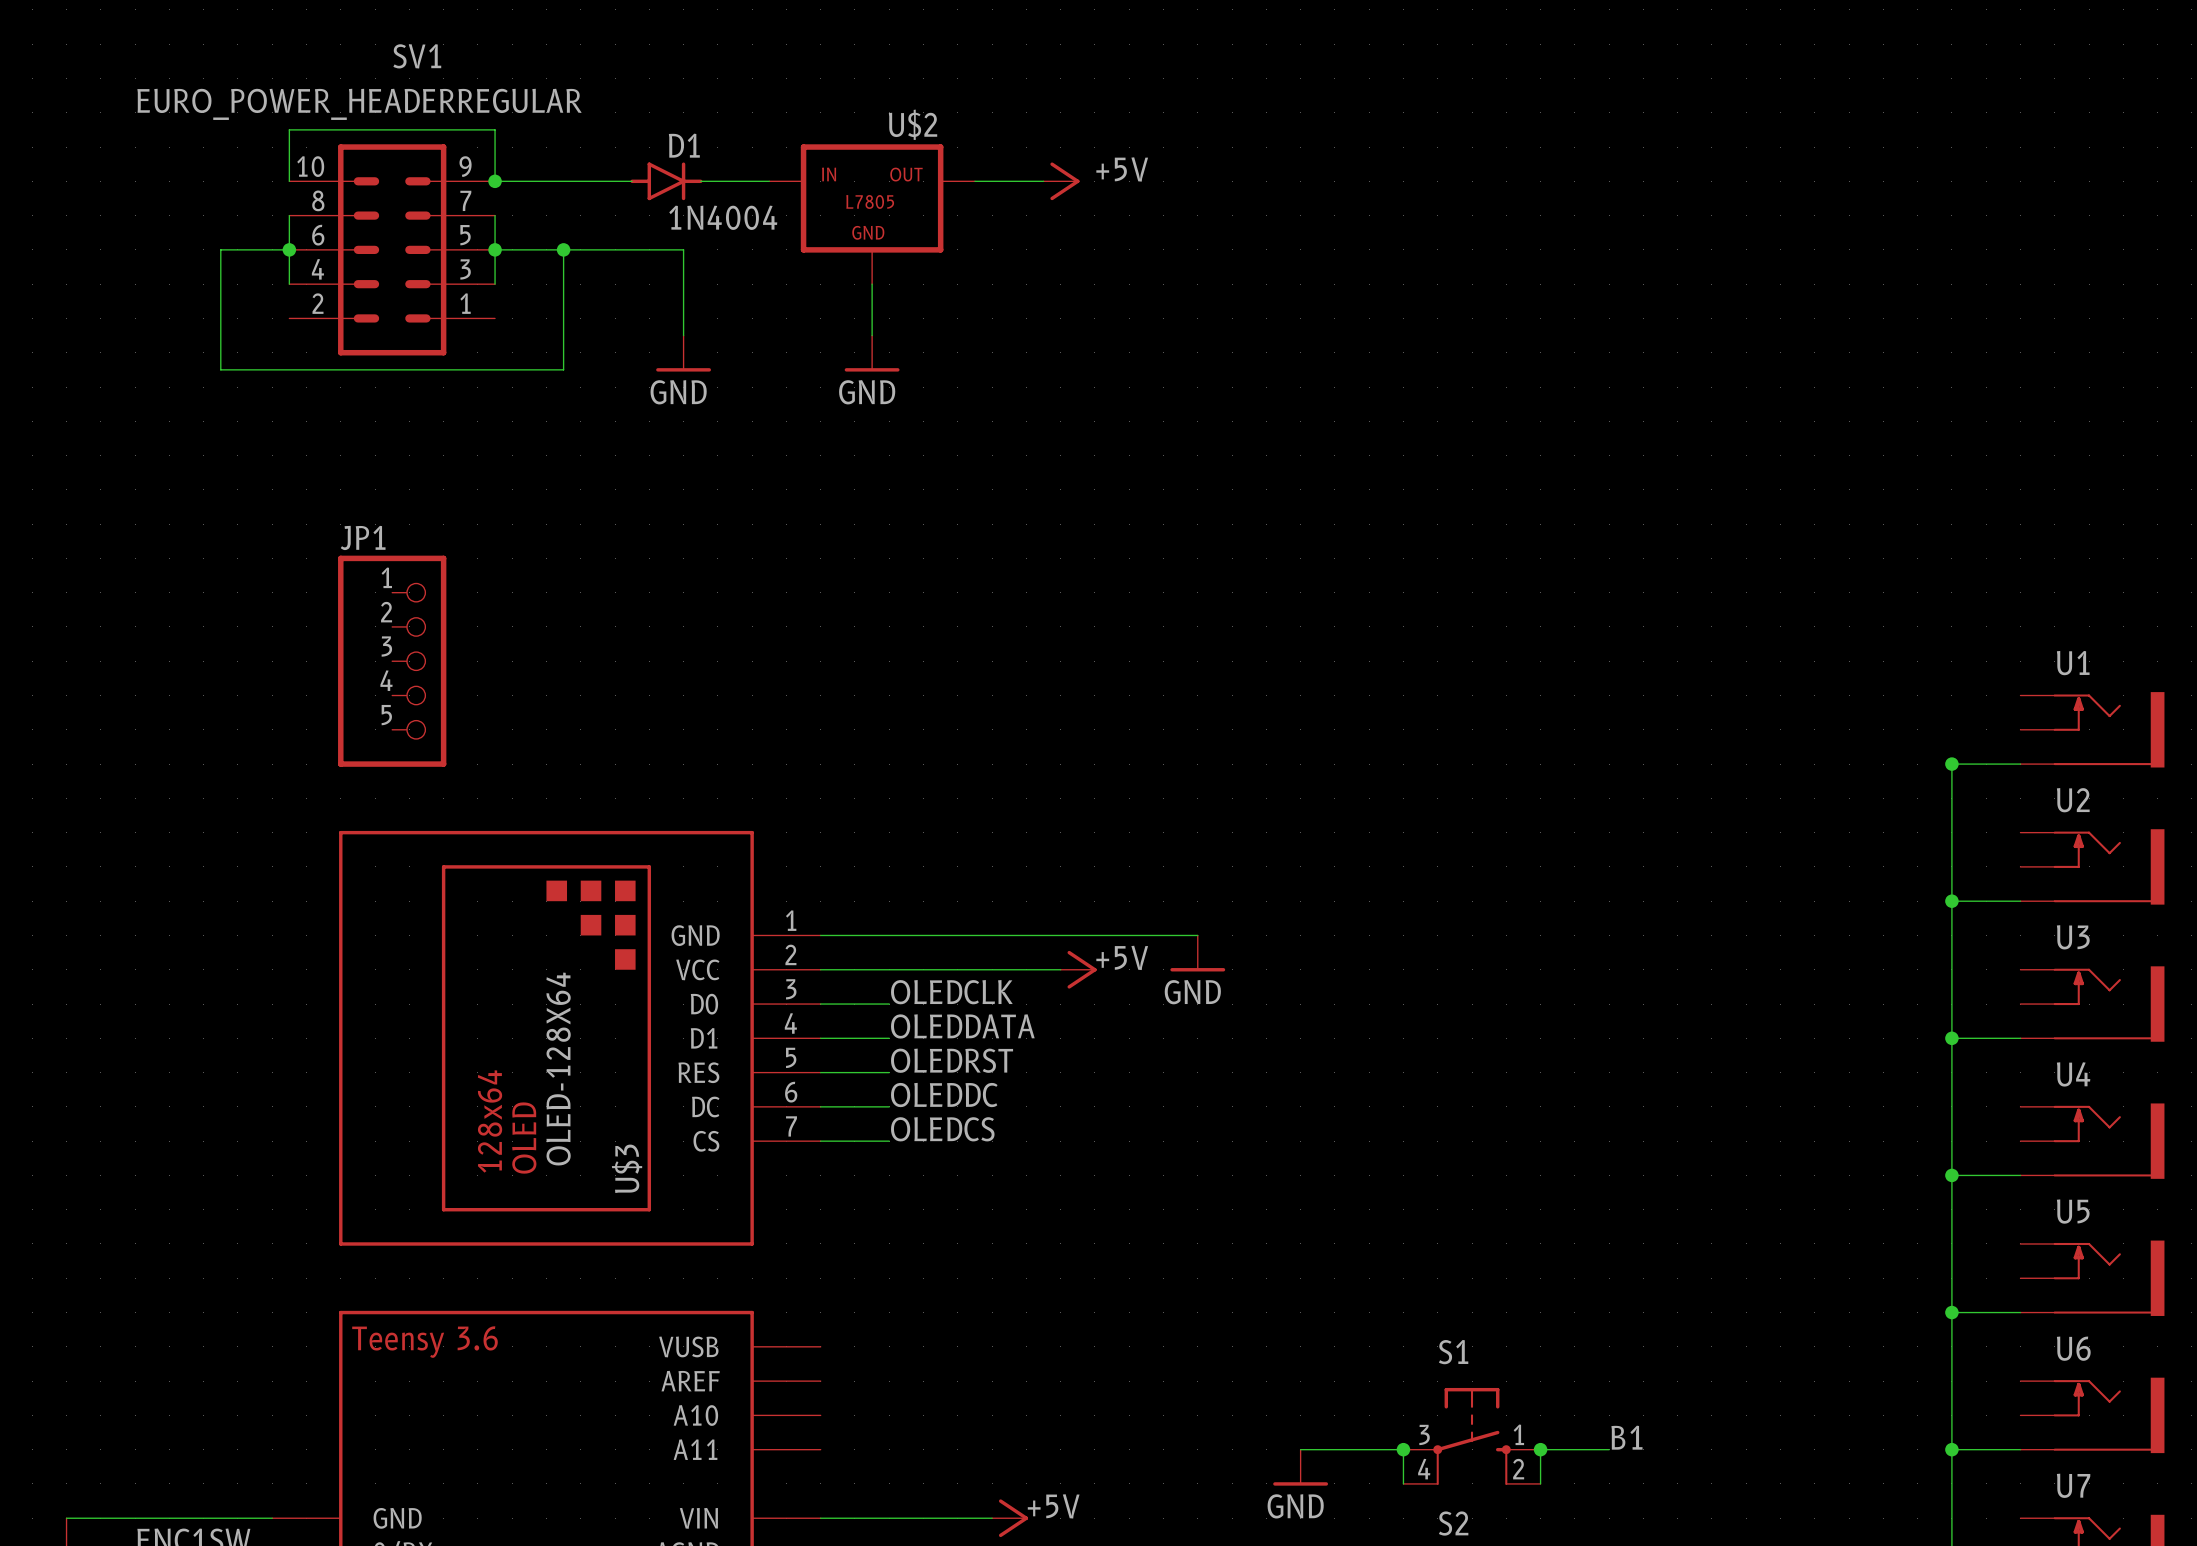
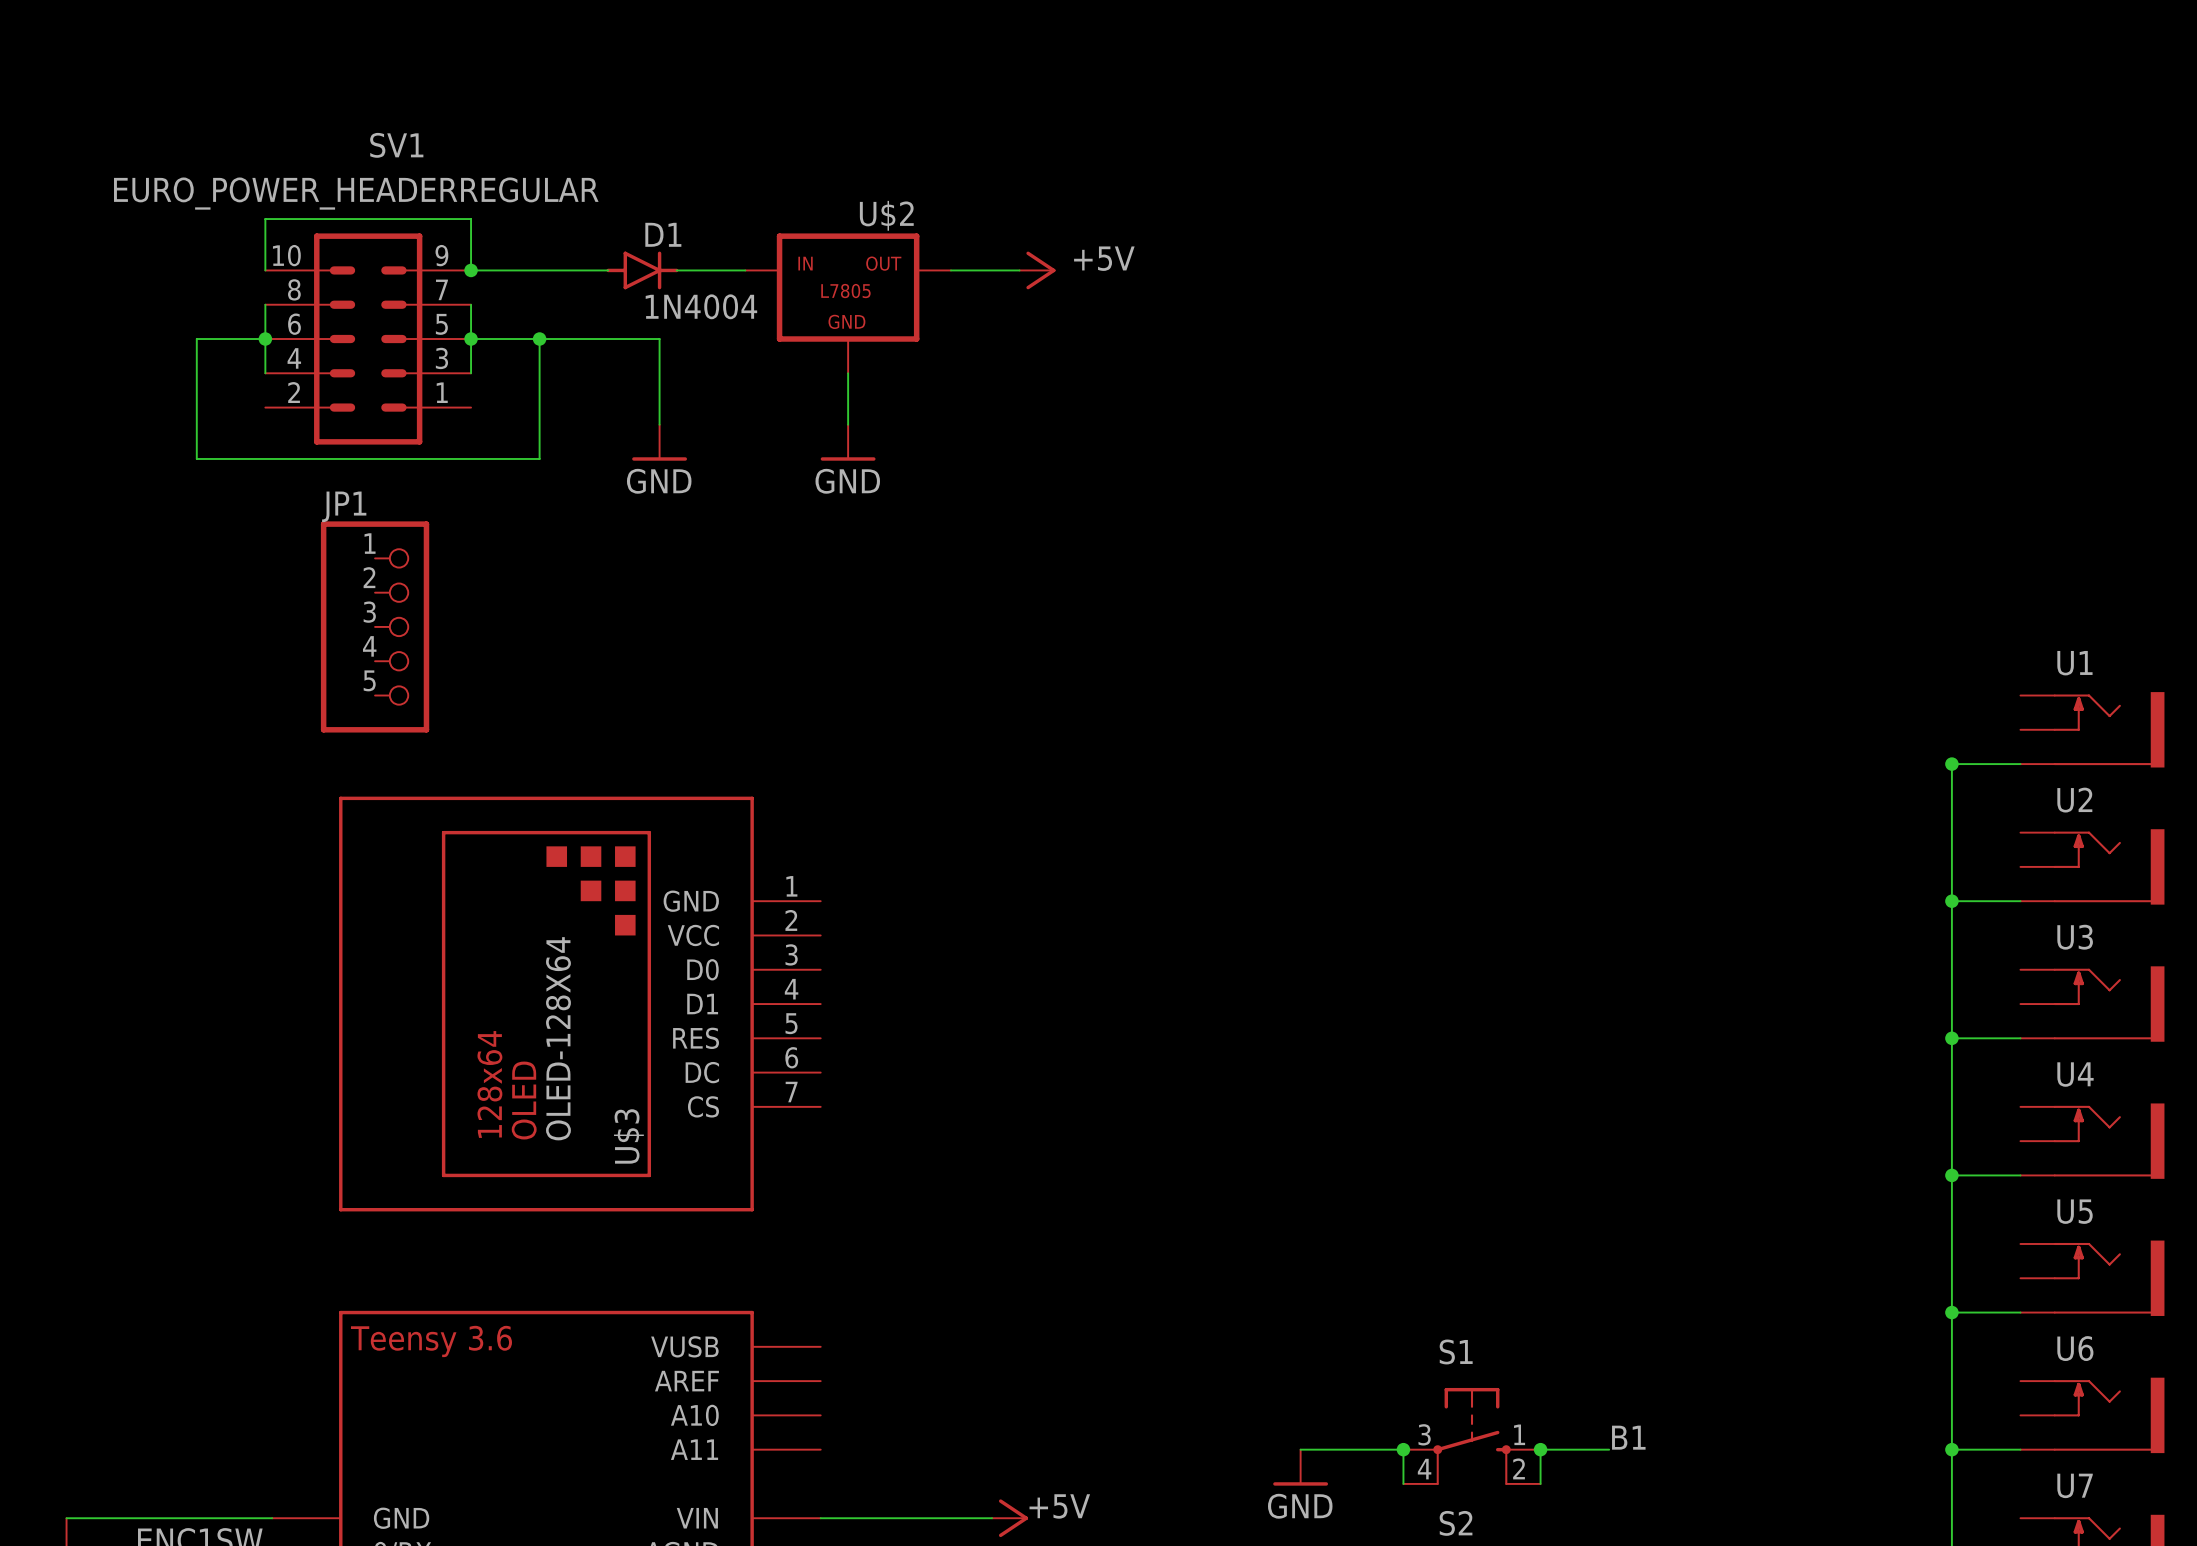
wire: (289, 181) (289, 129) (495, 129) (495, 181) (632, 181) -> (265, 270) (265, 219) (471, 219) (471, 270) (608, 270)
junction: (495, 181) -> none
D1 position: (666, 181) -> (642, 270)
wire: (700, 181) (769, 181) -> (676, 270) (745, 270)
wire: (974, 181) (1043, 181) -> (950, 270) (1019, 270)
power symbol position: +5V (1061, 181) -> +5V (1037, 270)
U$2 position: (872, 214) -> (848, 303)
wire: (289, 215) (289, 284) -> (265, 304) (265, 373)
wire: (495, 215) (495, 284) -> (471, 304) (471, 373)
wire: (289, 249) (220, 249) (220, 369) (563, 369) (563, 249) -> (265, 339) (196, 339) (196, 458) (539, 458) (539, 339)
junction: (289, 249) -> none
SV1 position: (392, 249) -> (368, 339)
wire: (495, 249) (683, 249) (683, 335) -> (471, 339) (659, 339) (659, 424)
junction position: (495, 249) -> (471, 270)
junction: (563, 249) -> none
wire: (872, 284) (872, 335) -> (848, 373) (848, 424)
junction: none -> (265, 339)
junction: none -> (471, 339)
junction: none -> (539, 339)
power symbol position: GND (683, 353) -> GND (659, 442)
power symbol position: GND (872, 353) -> GND (848, 442)
JP1 position: (392, 661) -> (375, 626)
wire: (820, 935) (1197, 935) -> none
power symbol: GND (1197, 953) -> none
wire: (820, 969) (1060, 969) -> none
power symbol: +5V (1078, 969) -> none
label: OLEDCLK (951, 992) -> none
wire: (820, 1004) (889, 1004) -> none
label: OLEDDATA (962, 1026) -> none
U$3 position: (579, 1038) -> (579, 1004)
wire: (820, 1038) (889, 1038) -> none
label: OLEDRST (952, 1060) -> none
wire: (820, 1072) (889, 1072) -> none
label: OLEDDC (944, 1095) -> none
wire: (820, 1106) (889, 1106) -> none
label: OLEDCS (942, 1129) -> none
wire: (820, 1141) (889, 1141) -> none

